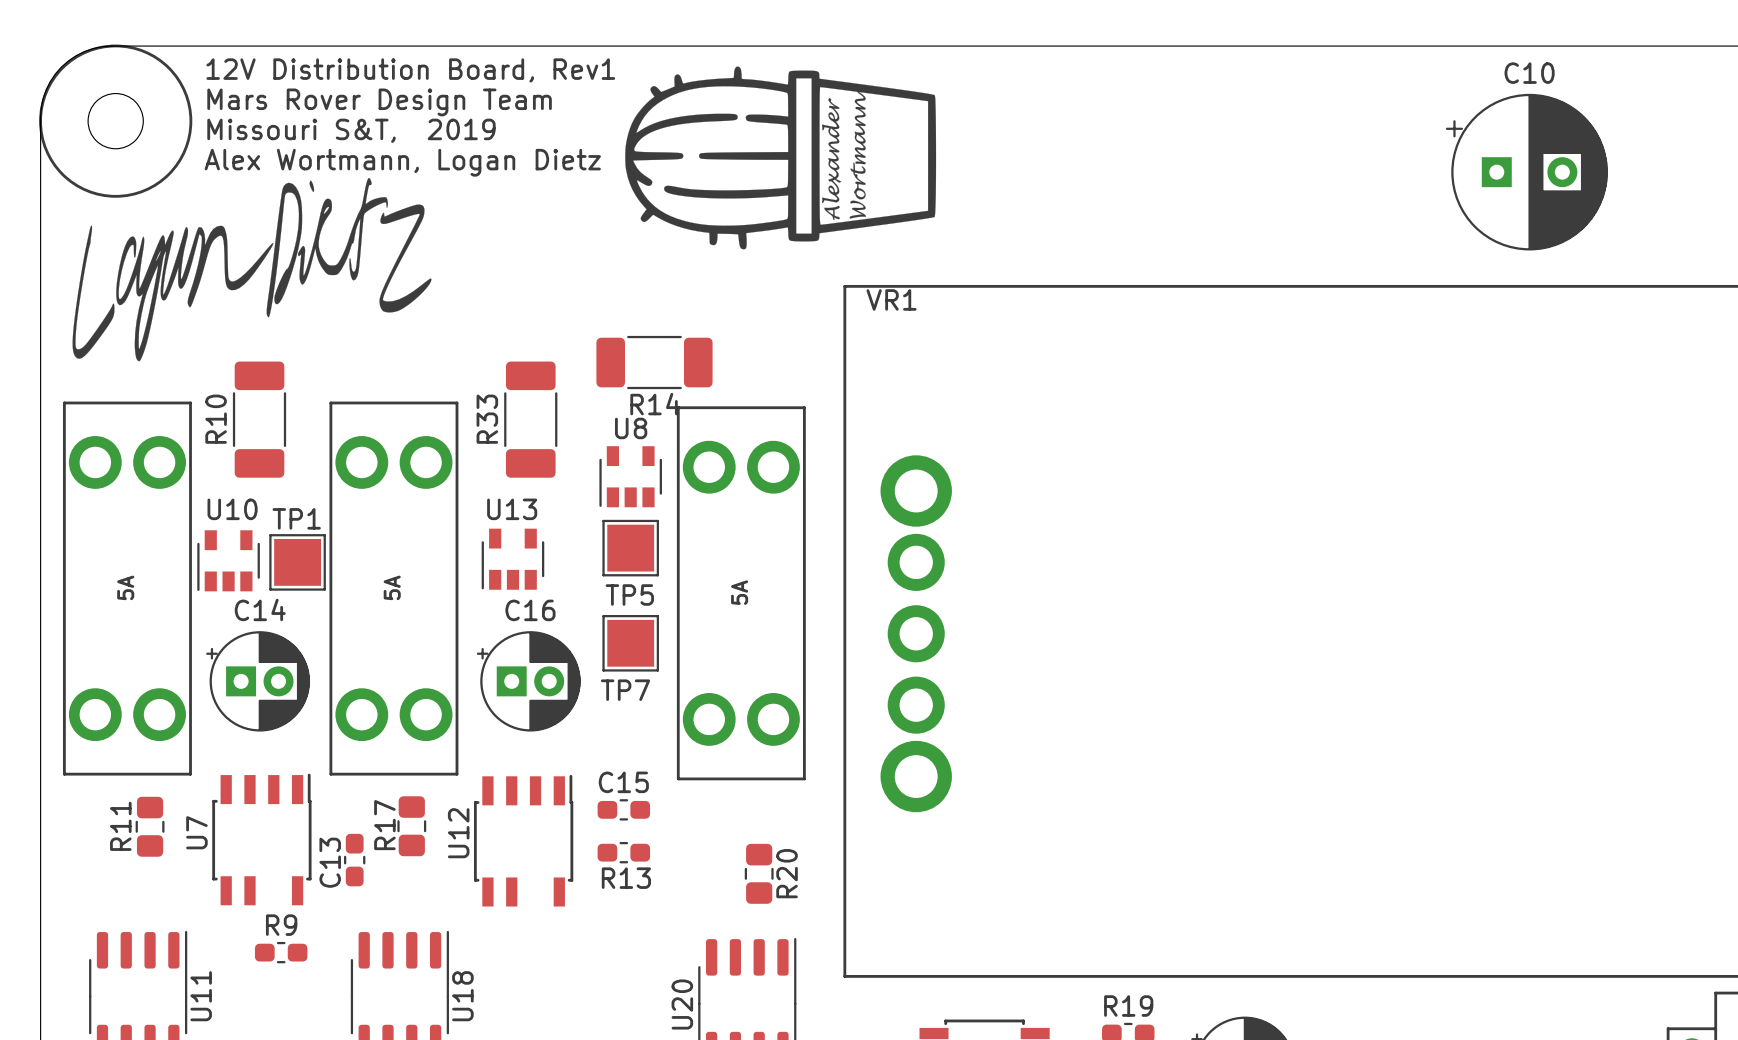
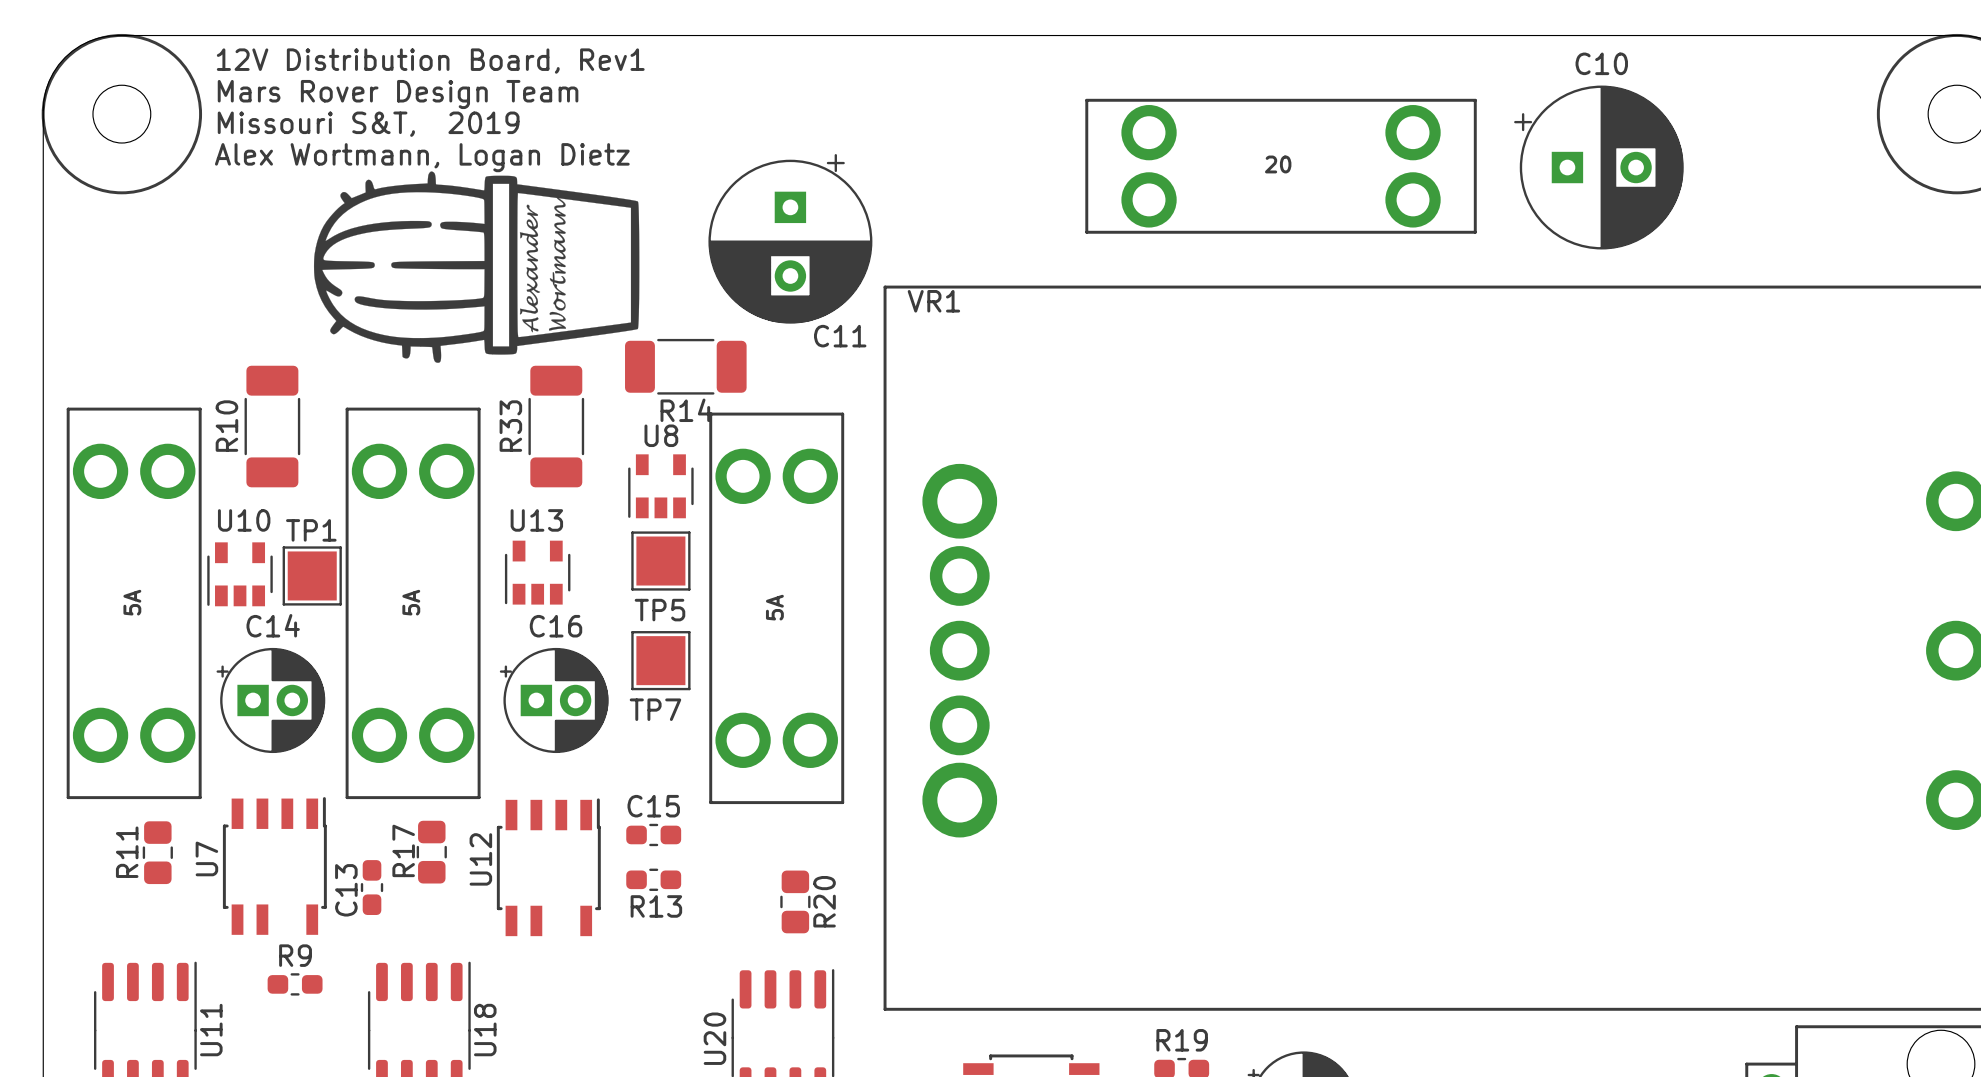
drawing position: (780, 157) -> (476, 267)
part: none -> 20 (1281, 166)
drawing: [72, 177, 432, 362] -> none
C11: none -> (790, 238)

